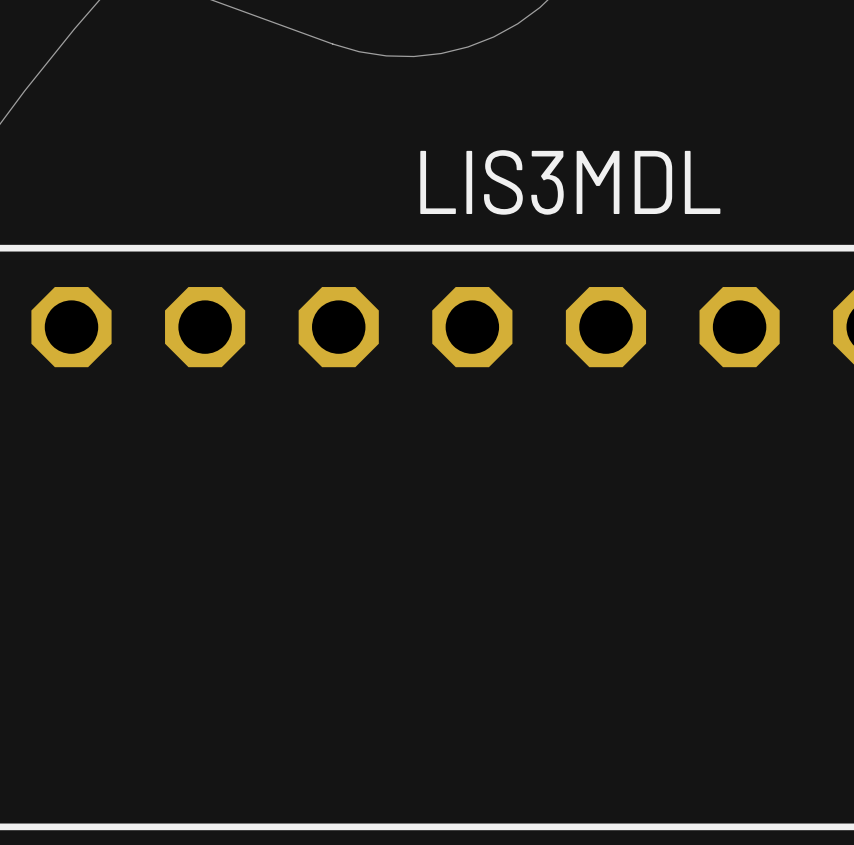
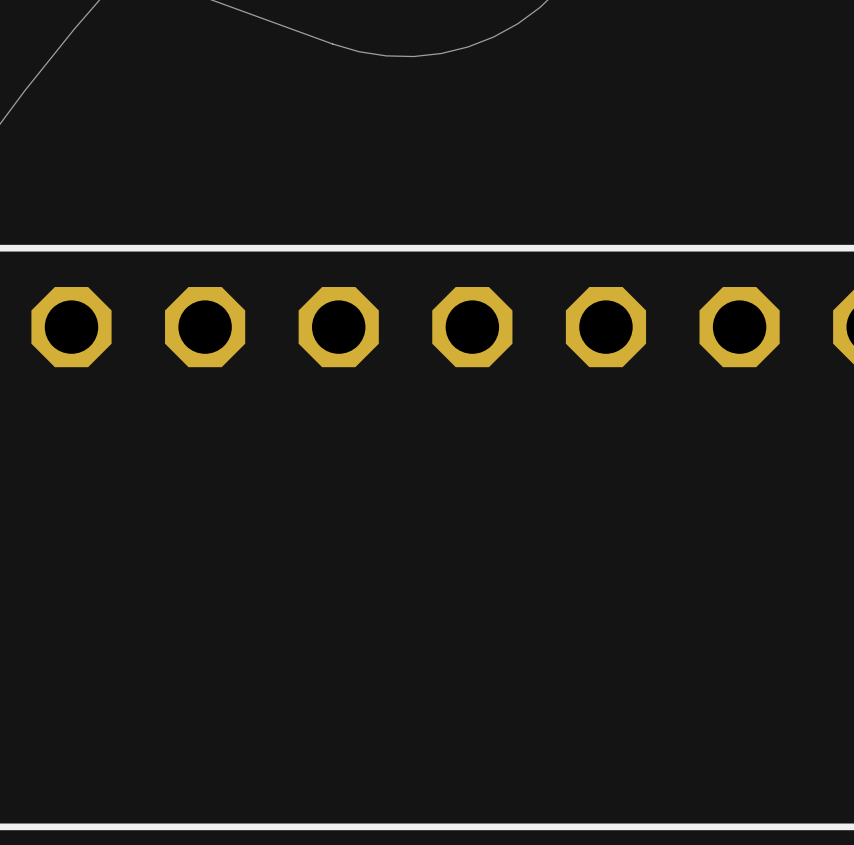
LIS3MDL name: LIS3MDL (570, 182) -> none

